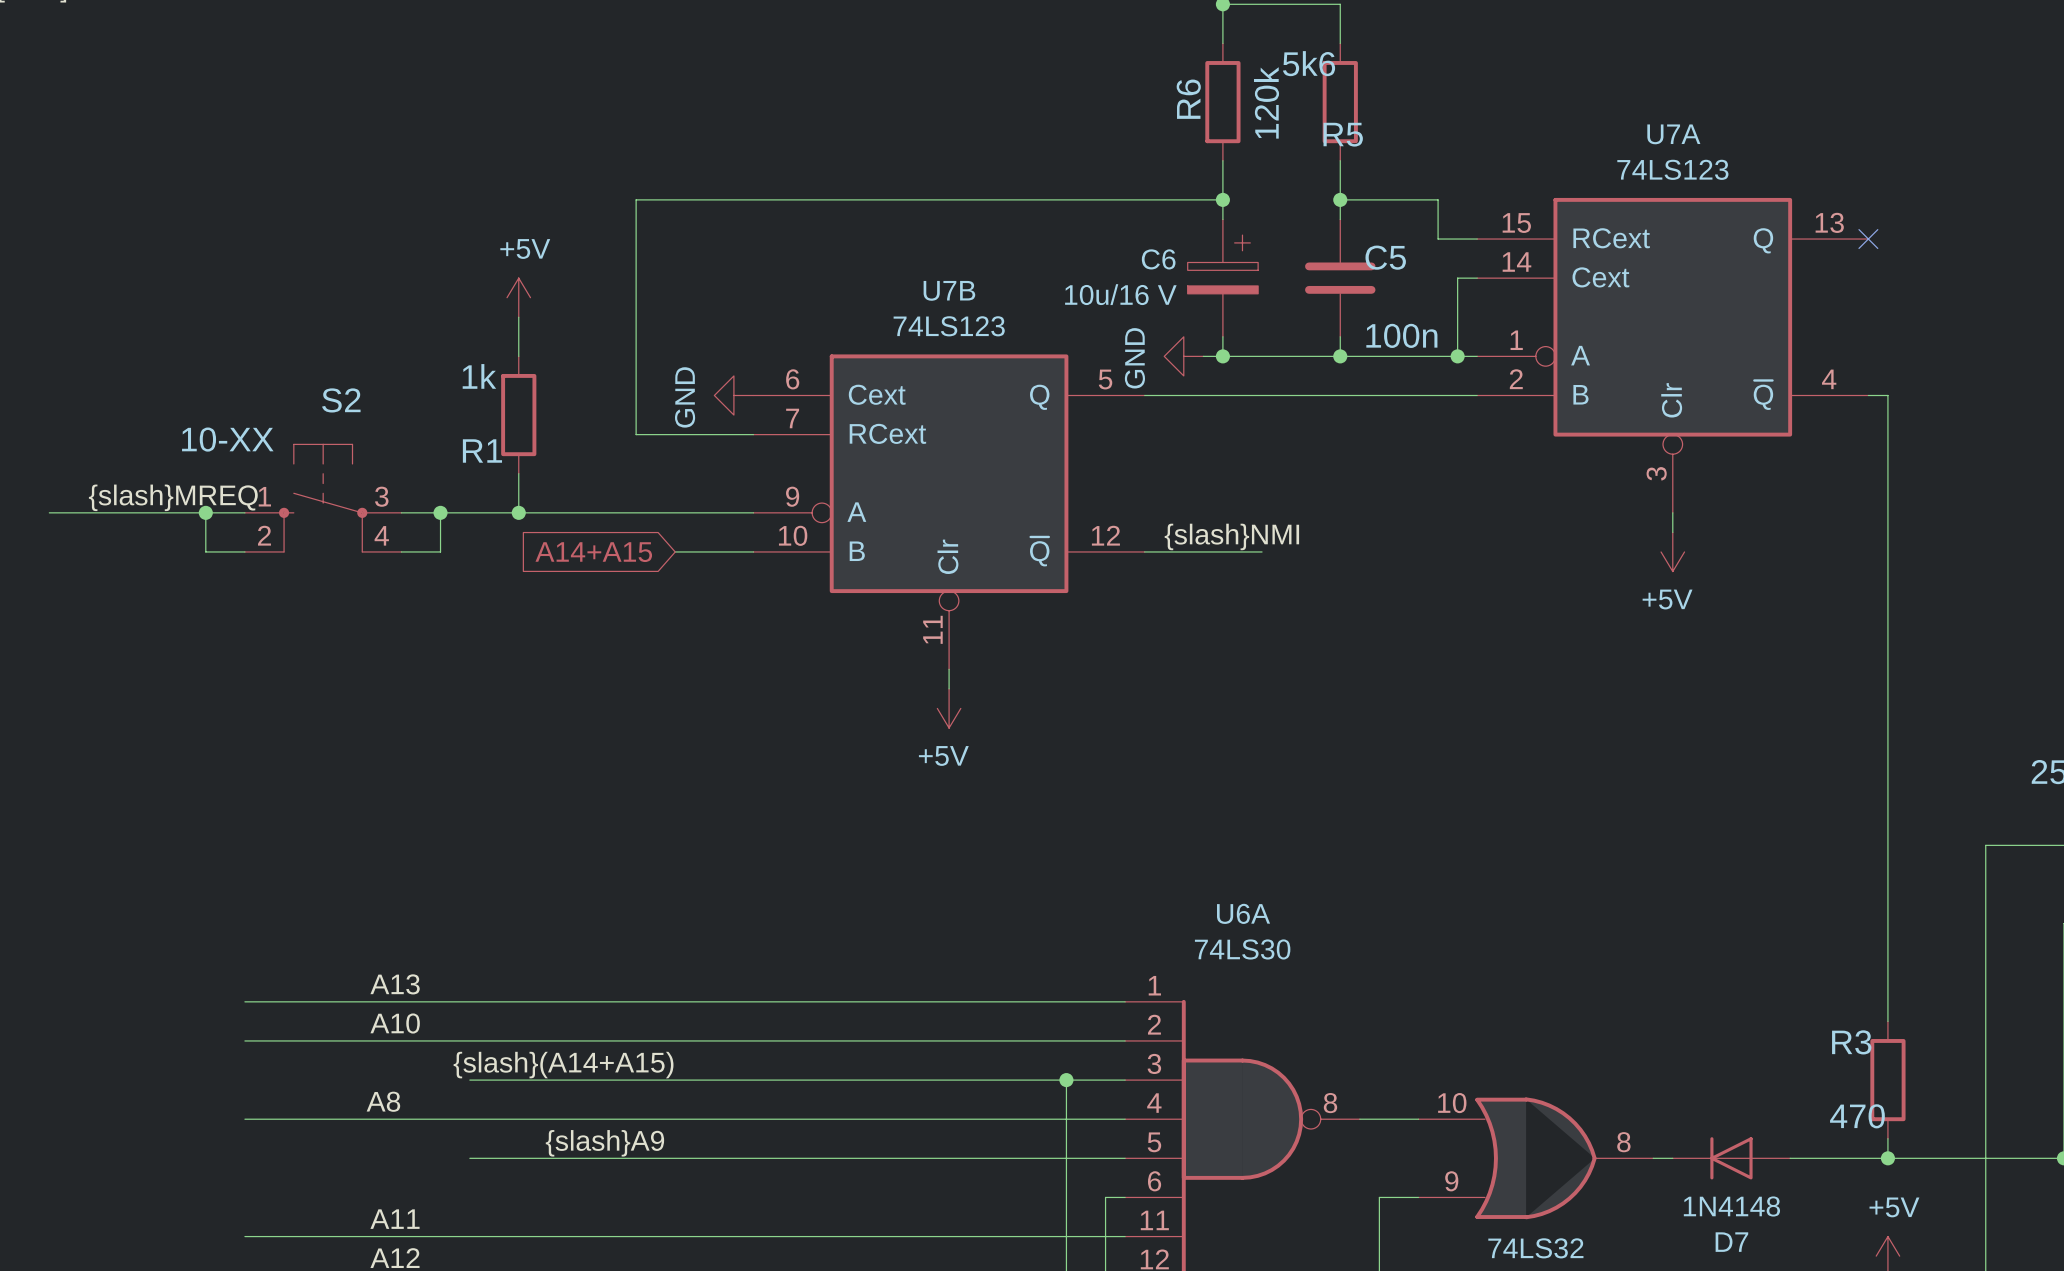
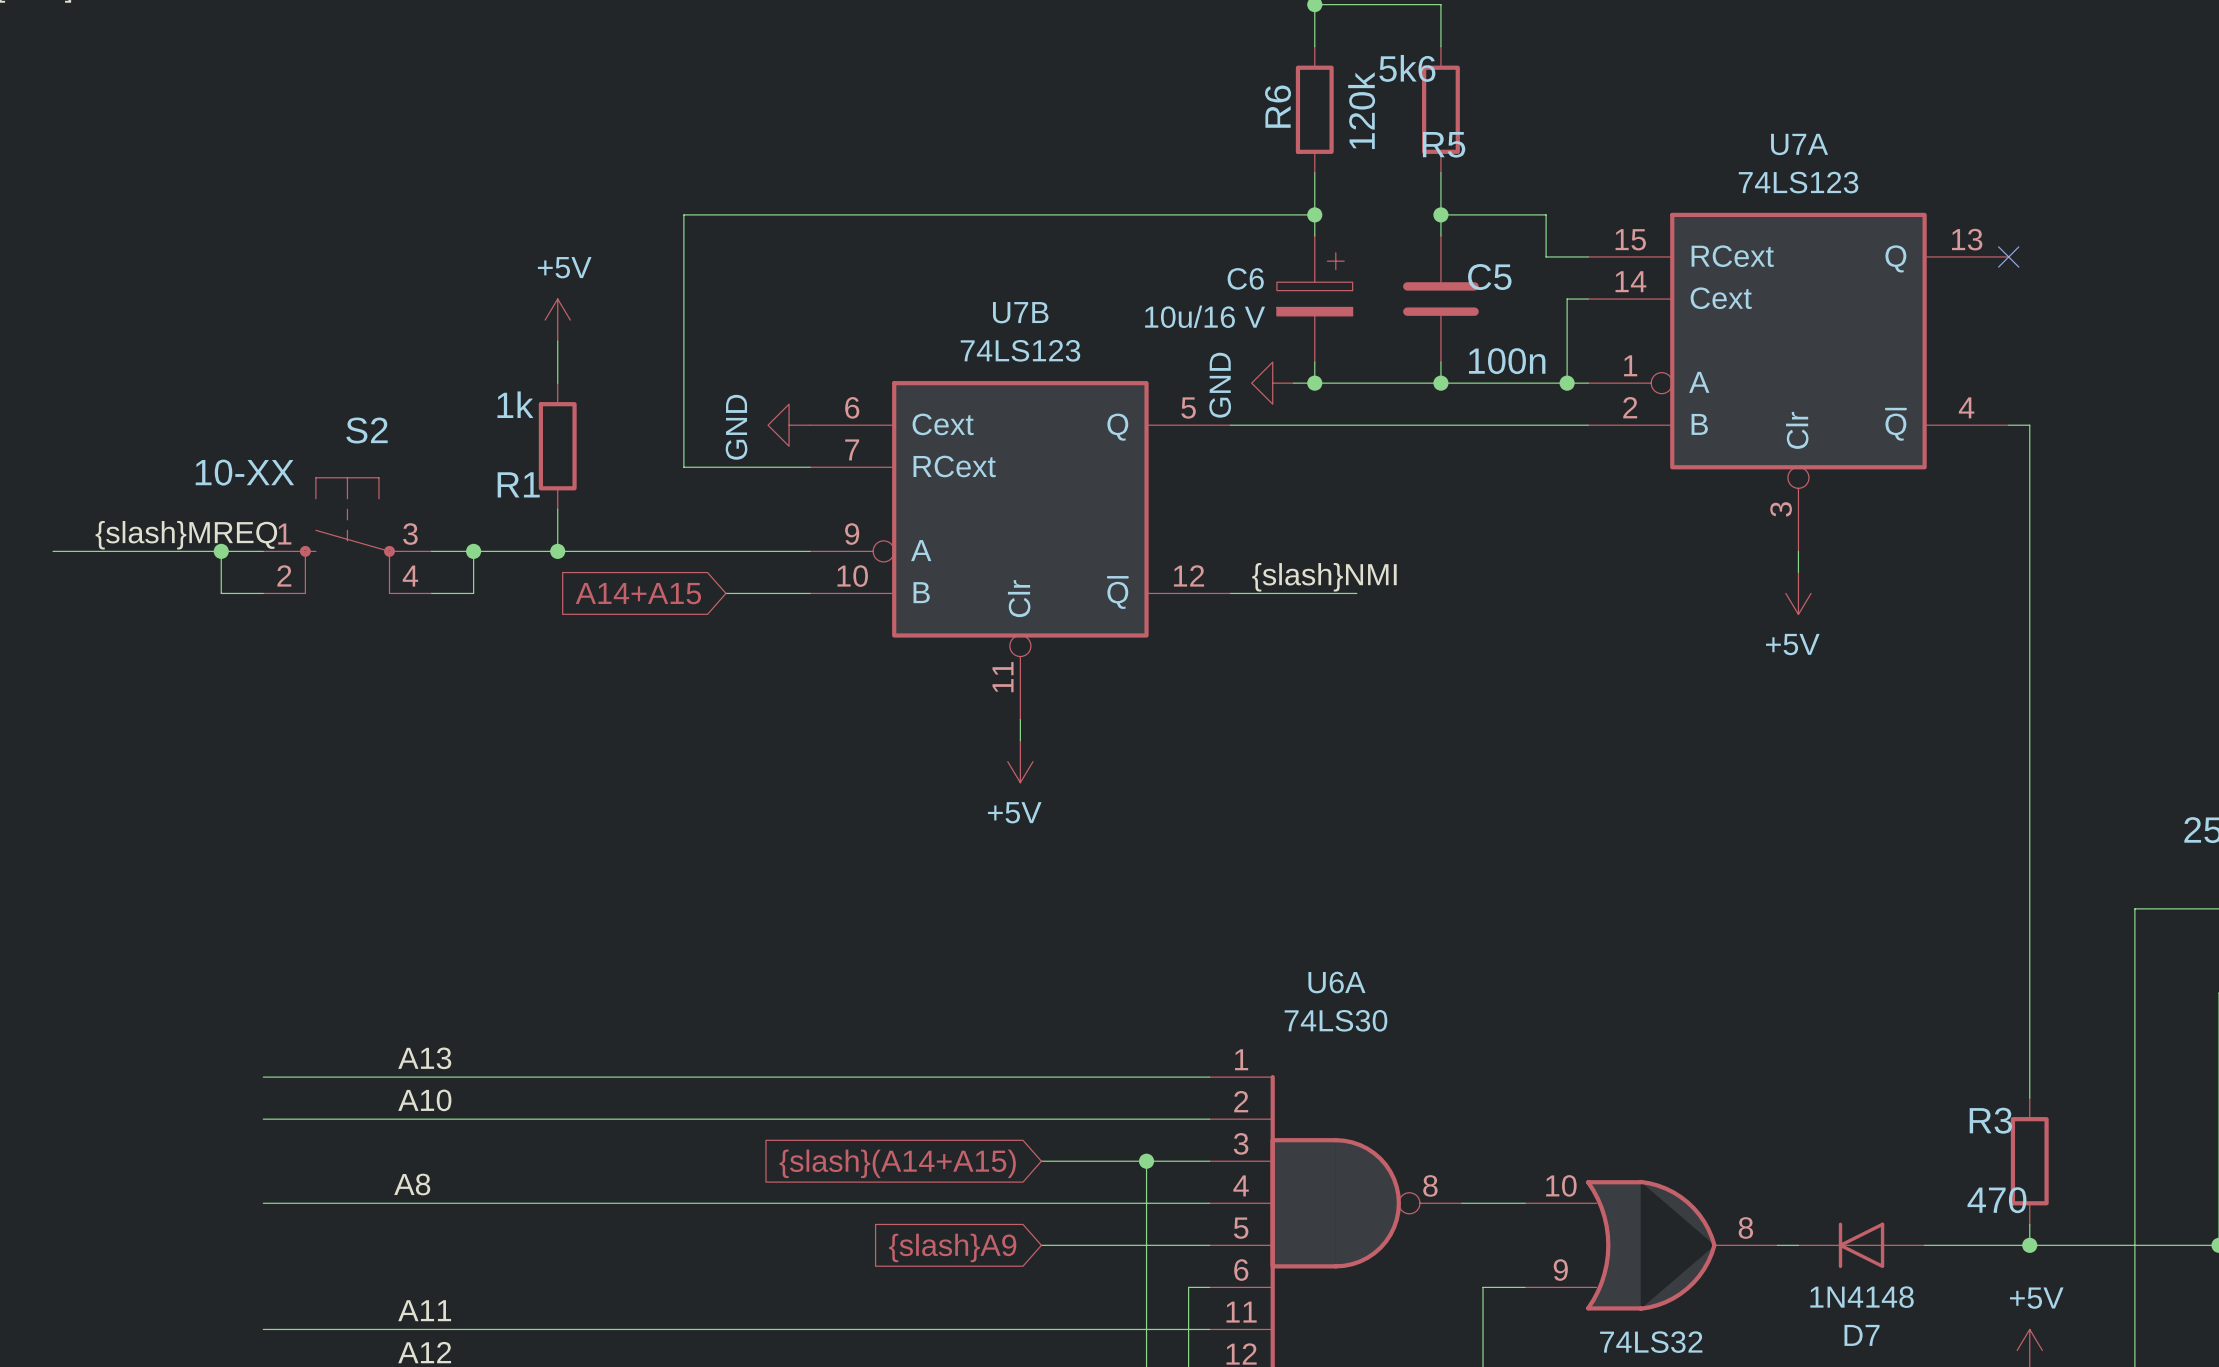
label: {slash}(A14+A15) (563, 1065) -> none
wire: (469, 1080) (968, 1080) -> none
global label: none -> {slash}(A14+A15) (897, 1163)
label: {slash}A9 (604, 1143) -> none
wire: (469, 1158) (968, 1158) -> none
global label: none -> {slash}A9 (952, 1247)

